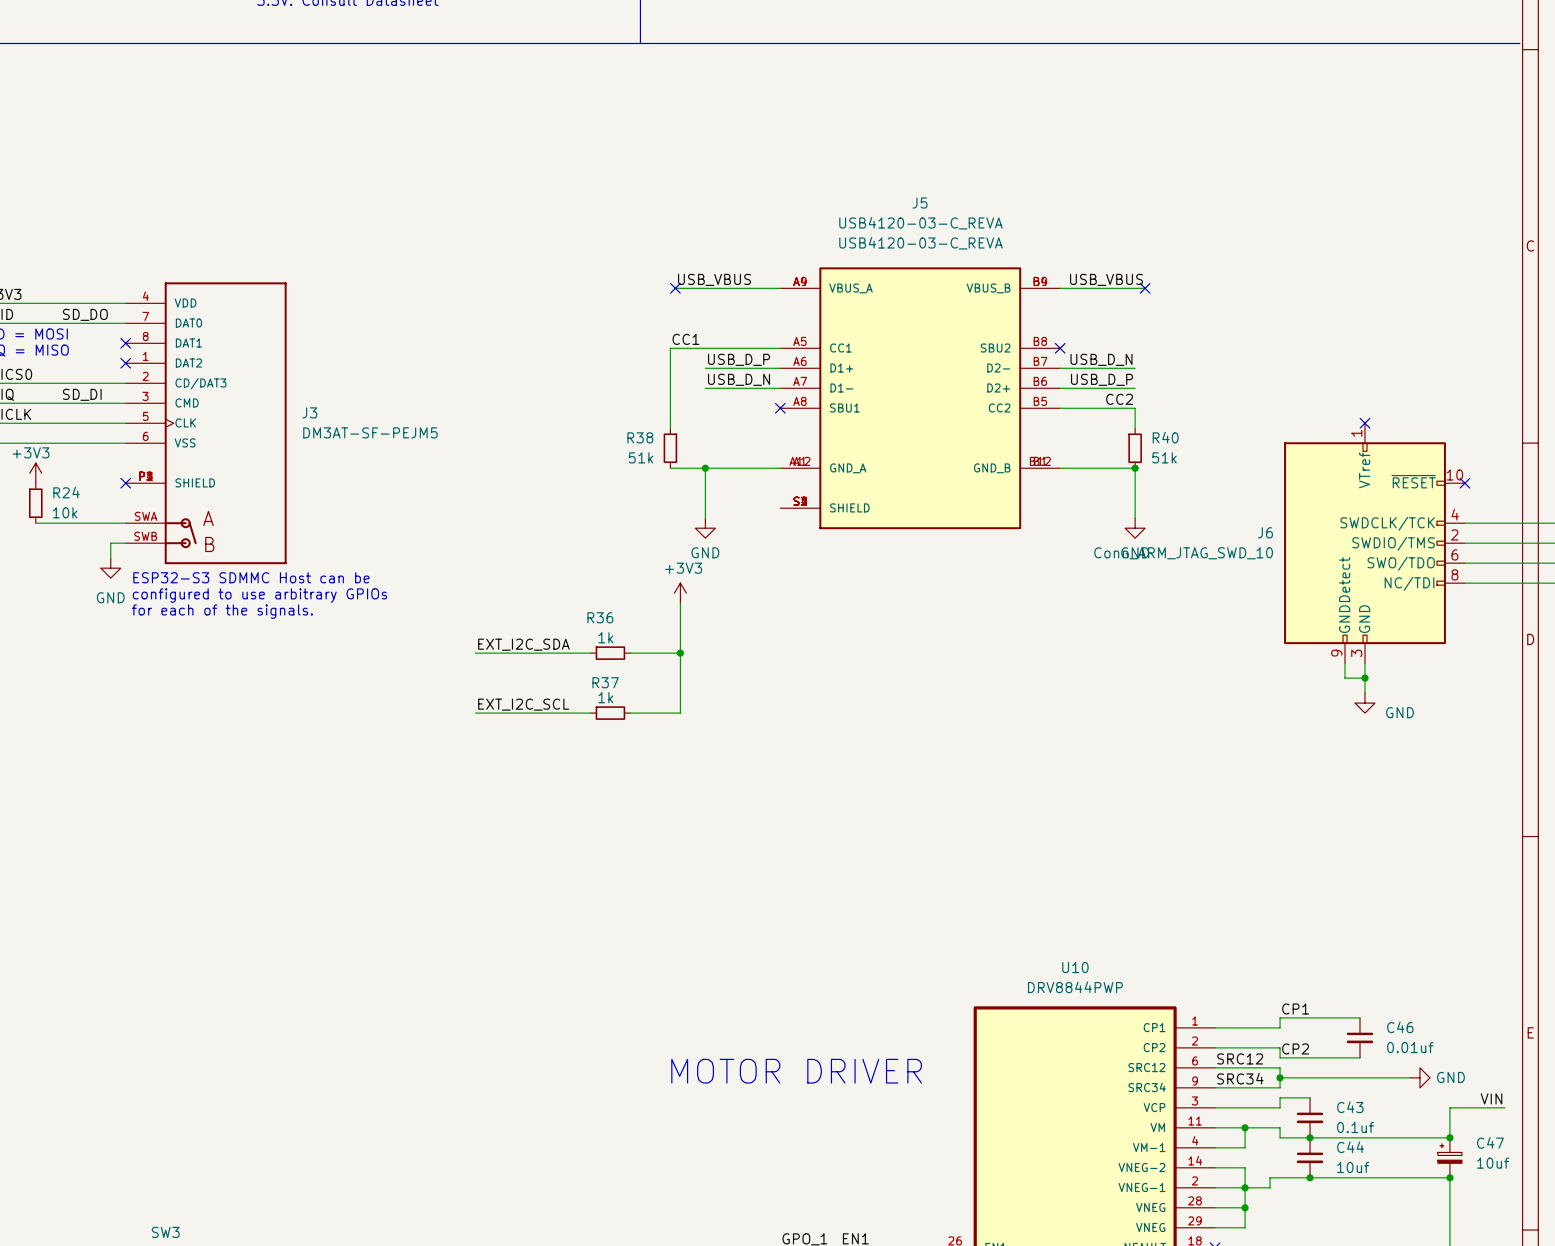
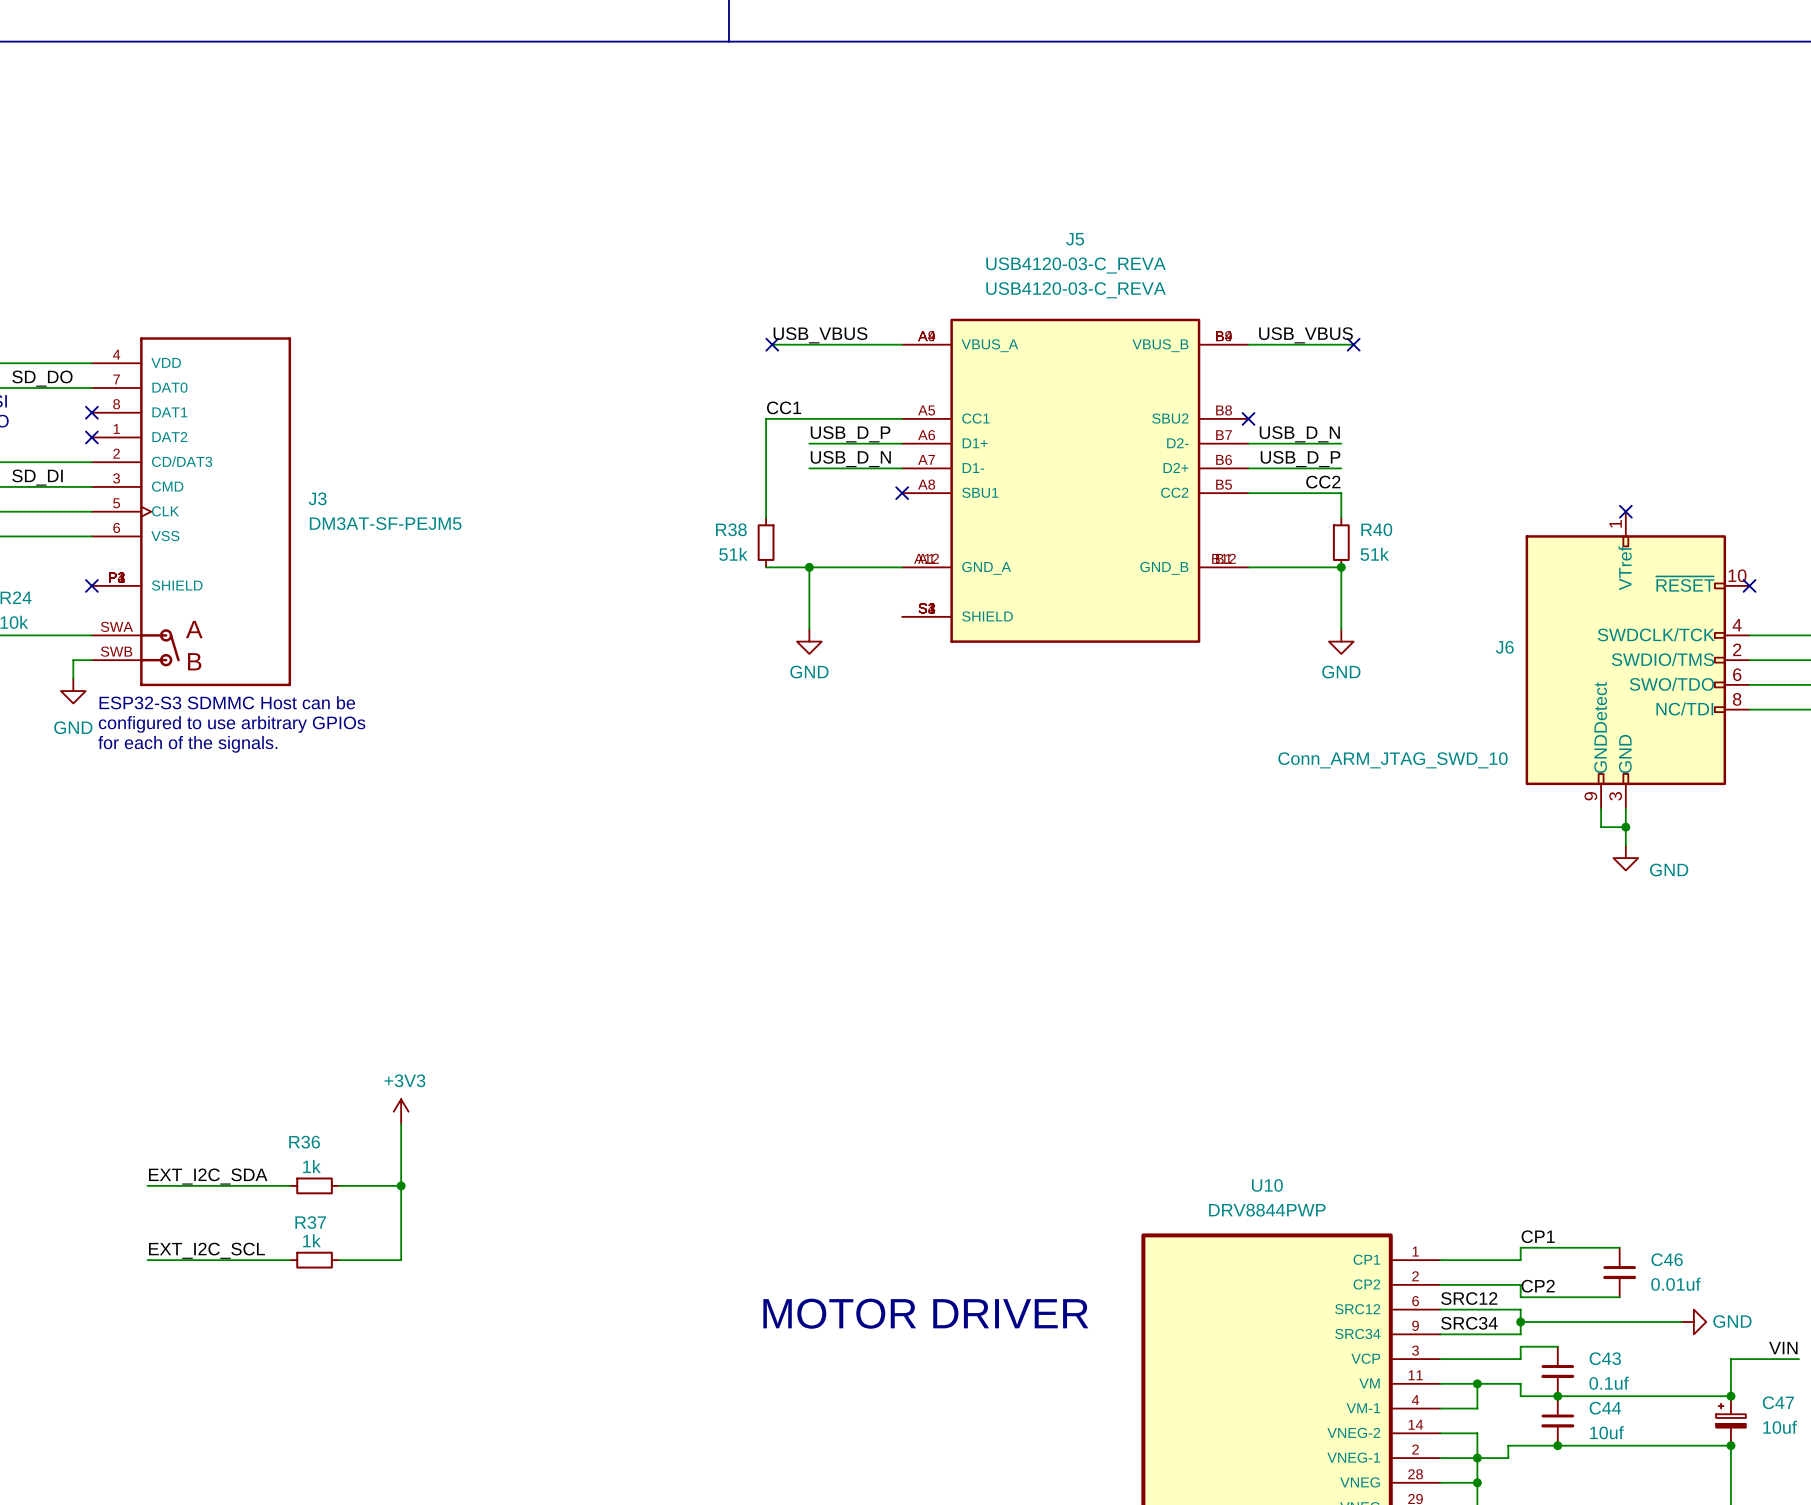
J6 value position: Conn_ARM_JTAG_SWD_10 (1183, 553) -> Conn_ARM_JTAG_SWD_10 (1392, 760)
power symbol: +3V3 (680, 593) -> none
wire: (680, 603) (680, 713) (630, 713) -> none
label: EXT_I2C_SDA (523, 644) -> none
wire: (475, 653) (590, 653) -> none
R36 position: (610, 653) -> (314, 1185)
wire: (630, 653) (680, 653) -> none
junction: (680, 653) -> none
label: EXT_I2C_SCL (523, 704) -> none
wire: (475, 713) (590, 713) -> none
R37 position: (610, 713) -> (314, 1260)
power symbol: none -> +3V3 (401, 1111)
wire: none -> (401, 1124) (401, 1260) (339, 1260)
label: none -> EXT_I2C_SDA (208, 1176)
wire: none -> (147, 1185) (289, 1185)
wire: none -> (339, 1185) (401, 1185)
junction: none -> (401, 1185)
label: none -> EXT_I2C_SCL (206, 1250)
wire: none -> (147, 1260) (289, 1260)

